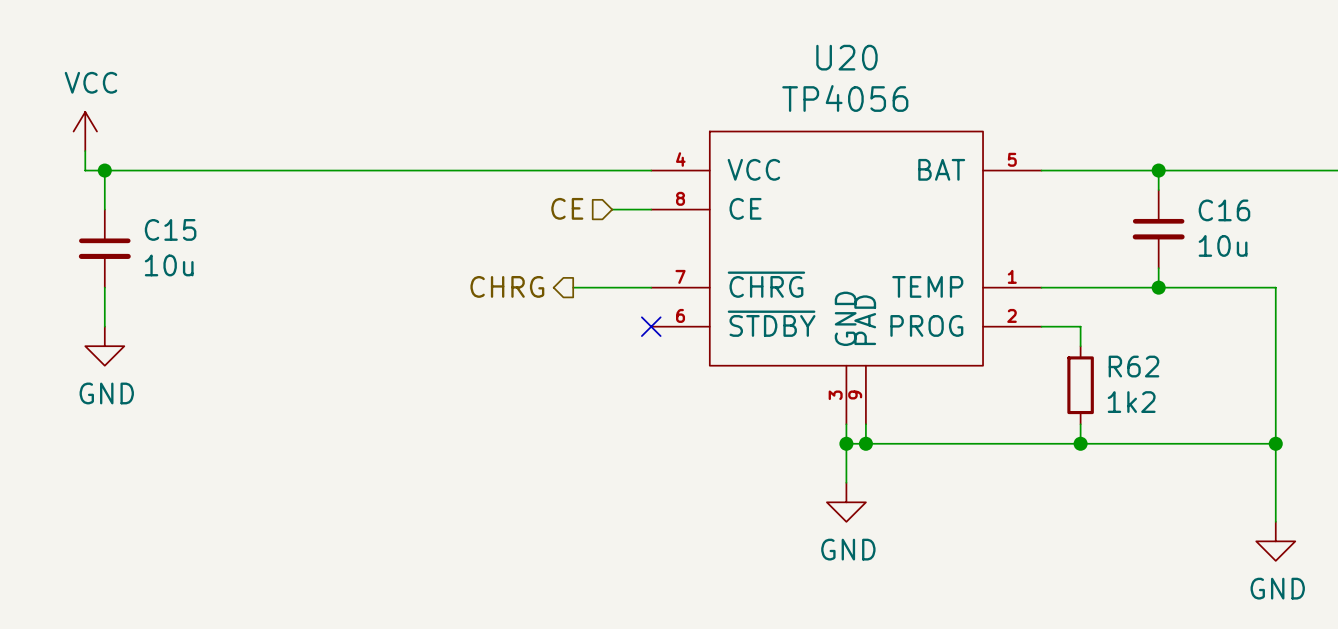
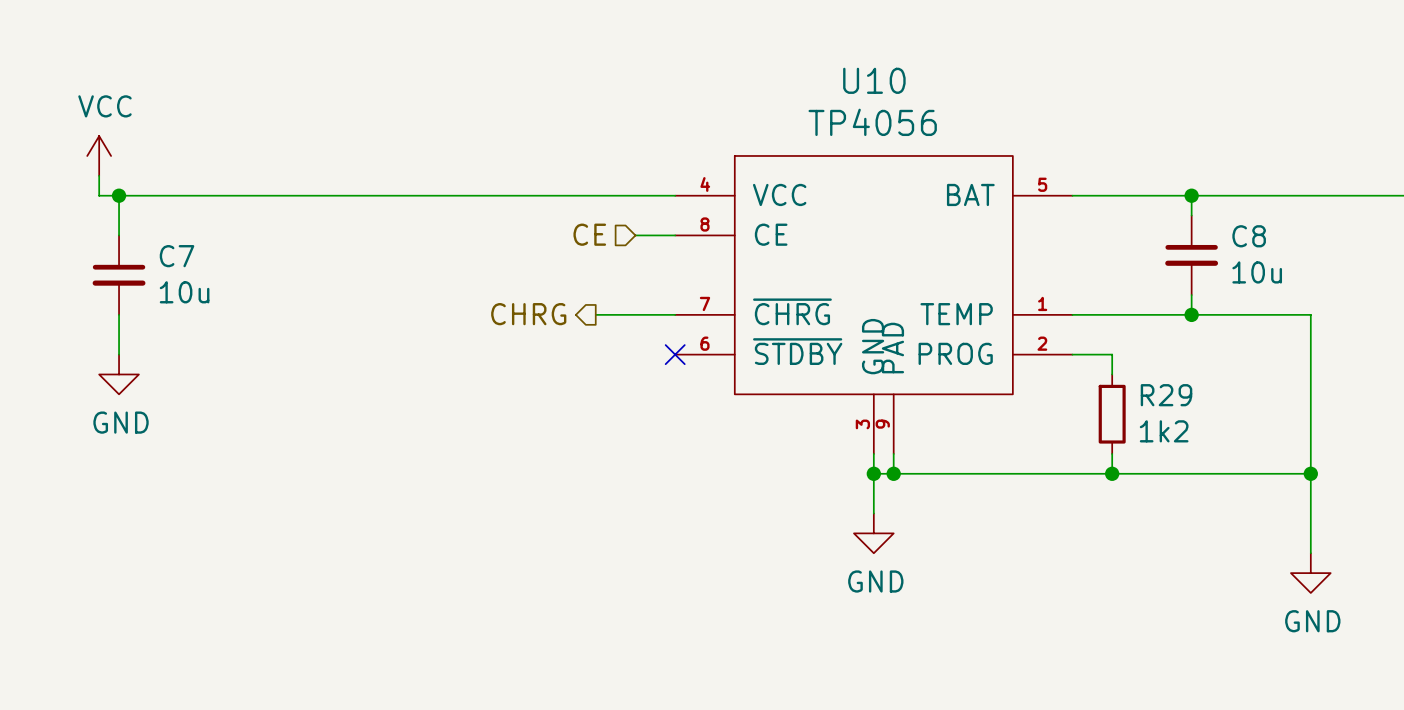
U20 name: U20 (846, 57) -> U10 (874, 80)
C16 name: C16 (1224, 210) -> C8 (1249, 236)
C15 name: C15 (170, 229) -> C7 (177, 256)
R62 name: R62 (1133, 366) -> R29 (1166, 395)

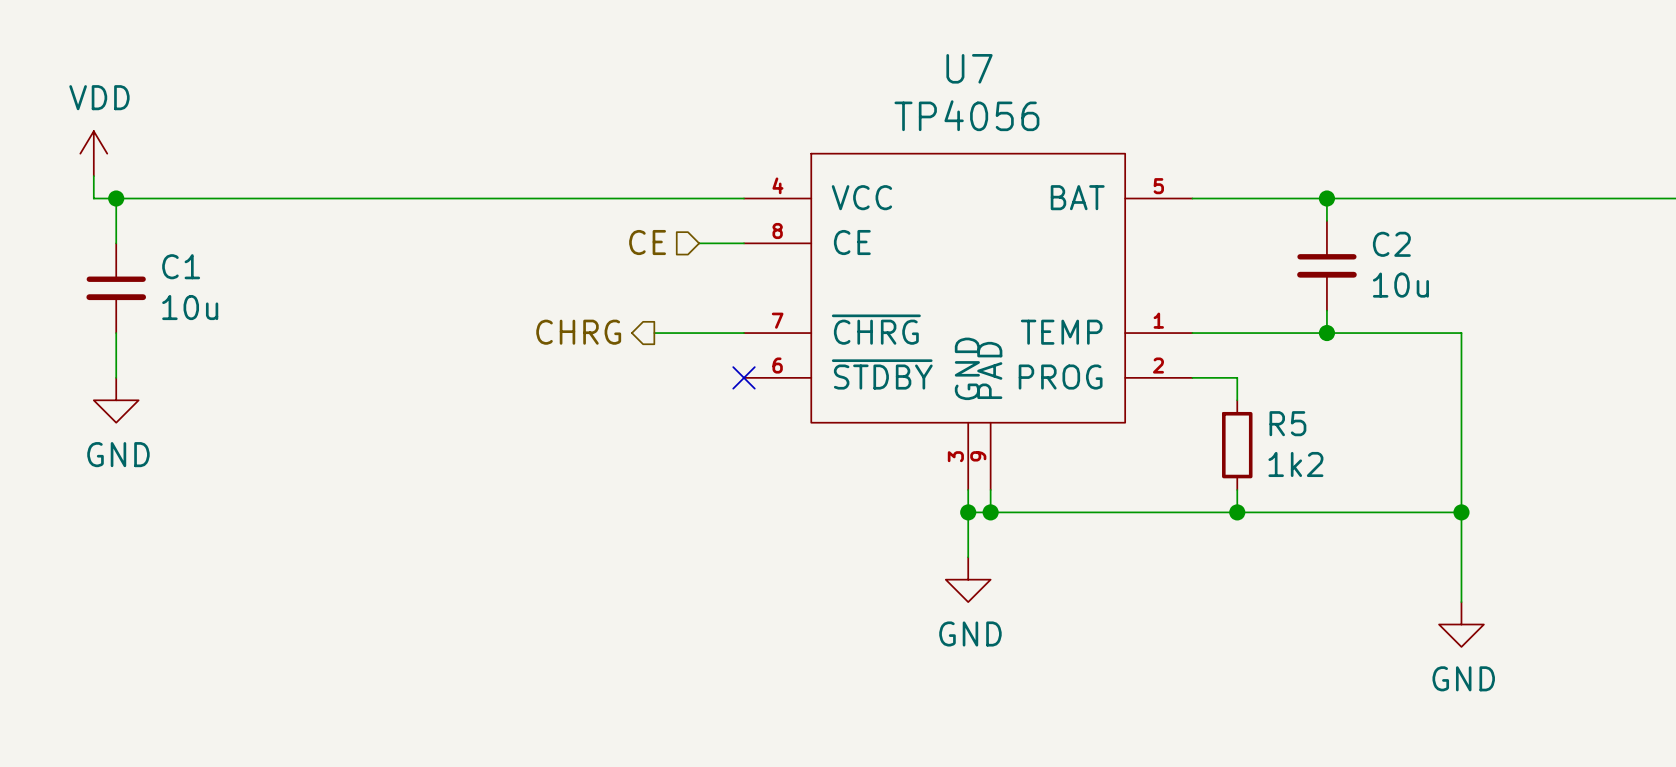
U10 name: U10 (874, 80) -> U7 (969, 68)
power symbol: VCC (99, 155) -> VDD (93, 153)
C8 name: C8 (1249, 236) -> C2 (1391, 244)
C7 name: C7 (177, 256) -> C1 (181, 266)
R29 name: R29 (1166, 395) -> R5 (1287, 423)

